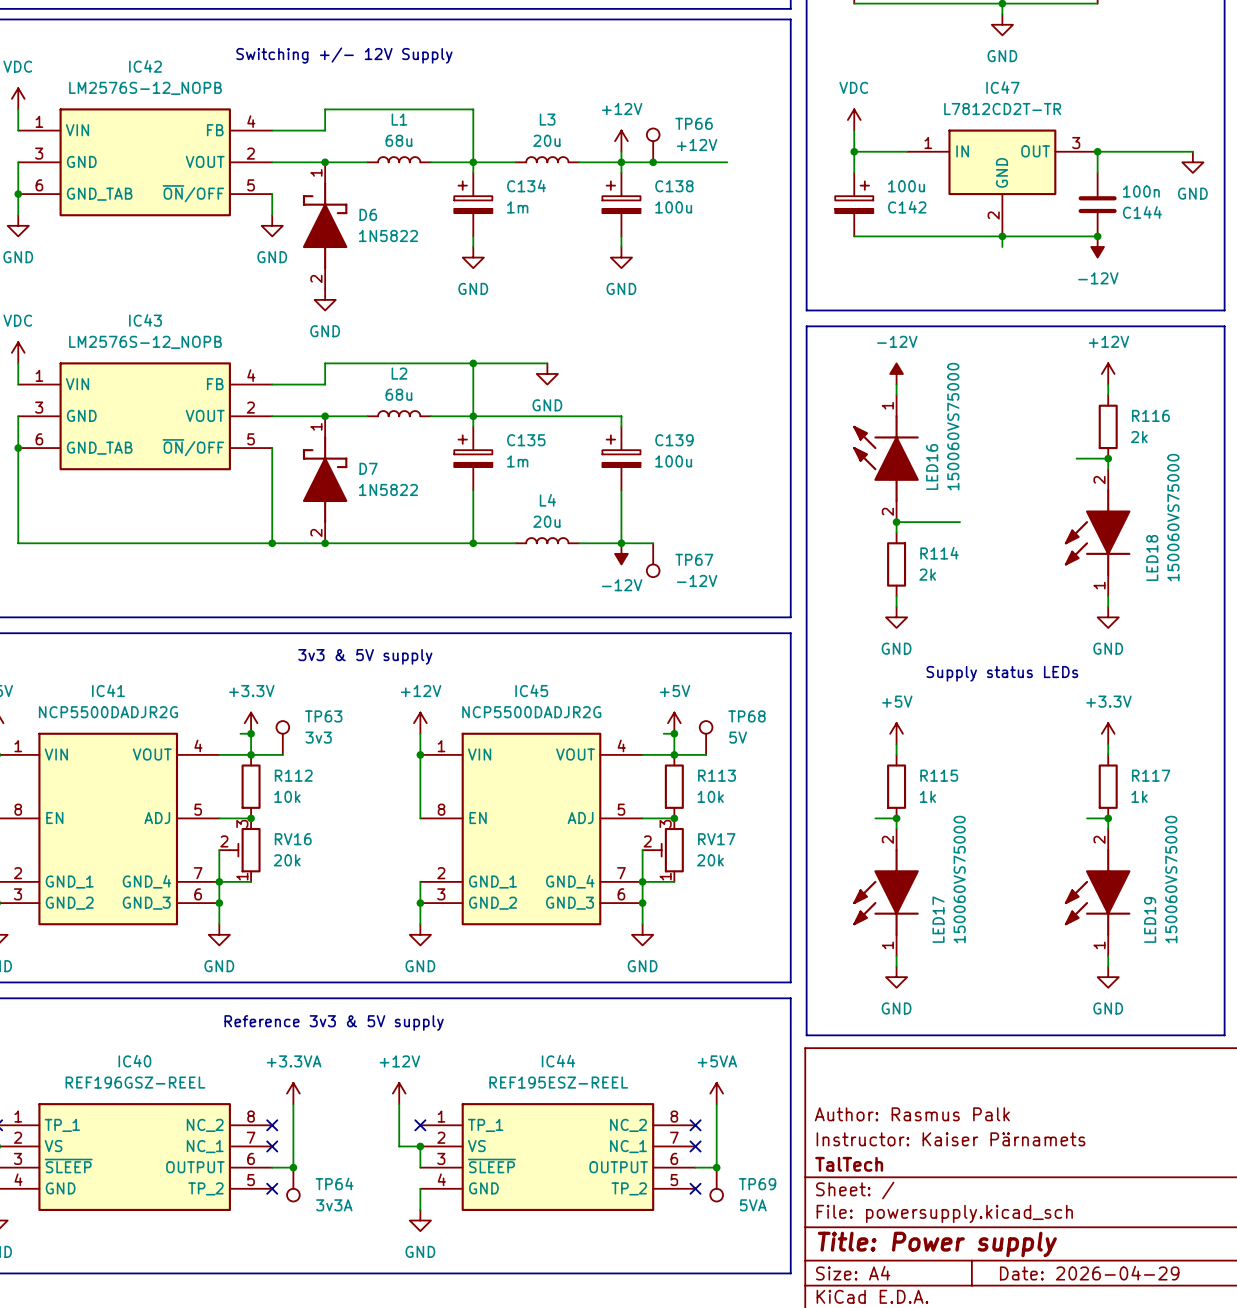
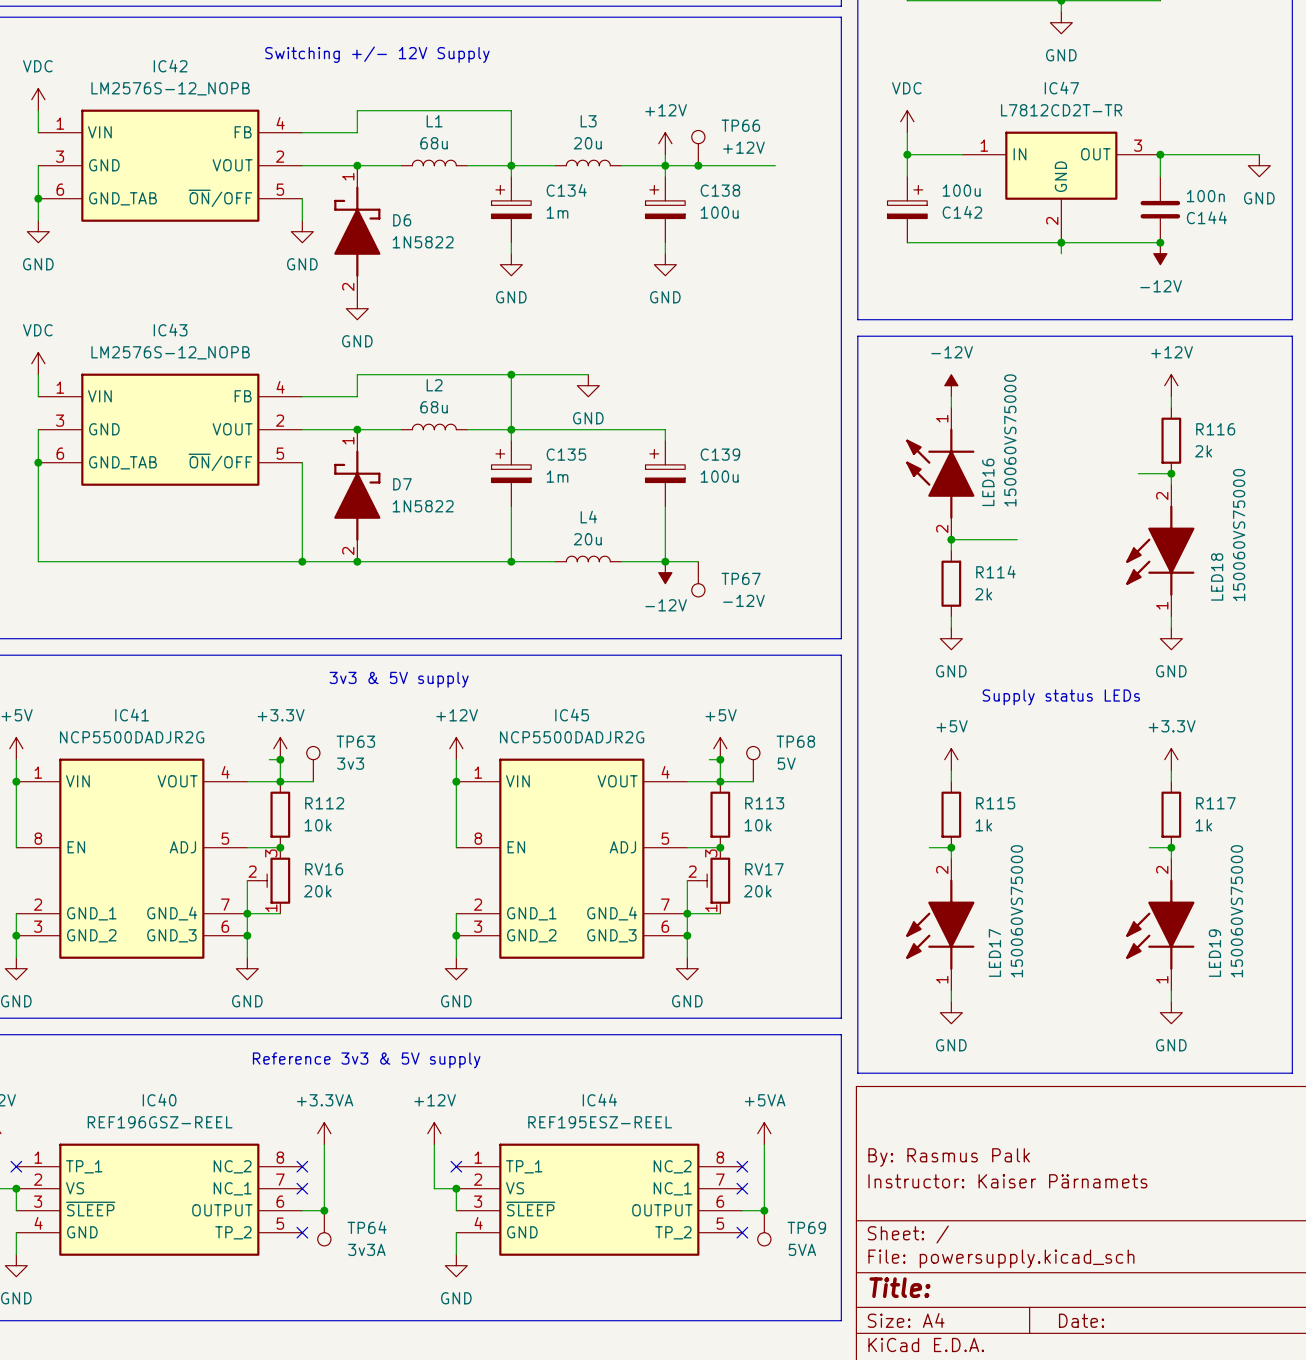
title block: Author: Rasmus Palk (912, 1114) -> By: Rasmus Palk (949, 1157)
title block: TalTech (849, 1164) -> none
title block: Title: Power supply (937, 1244) -> Title: (899, 1287)
title block: Date: 2026-04-29 (1089, 1273) -> Date: (1081, 1320)

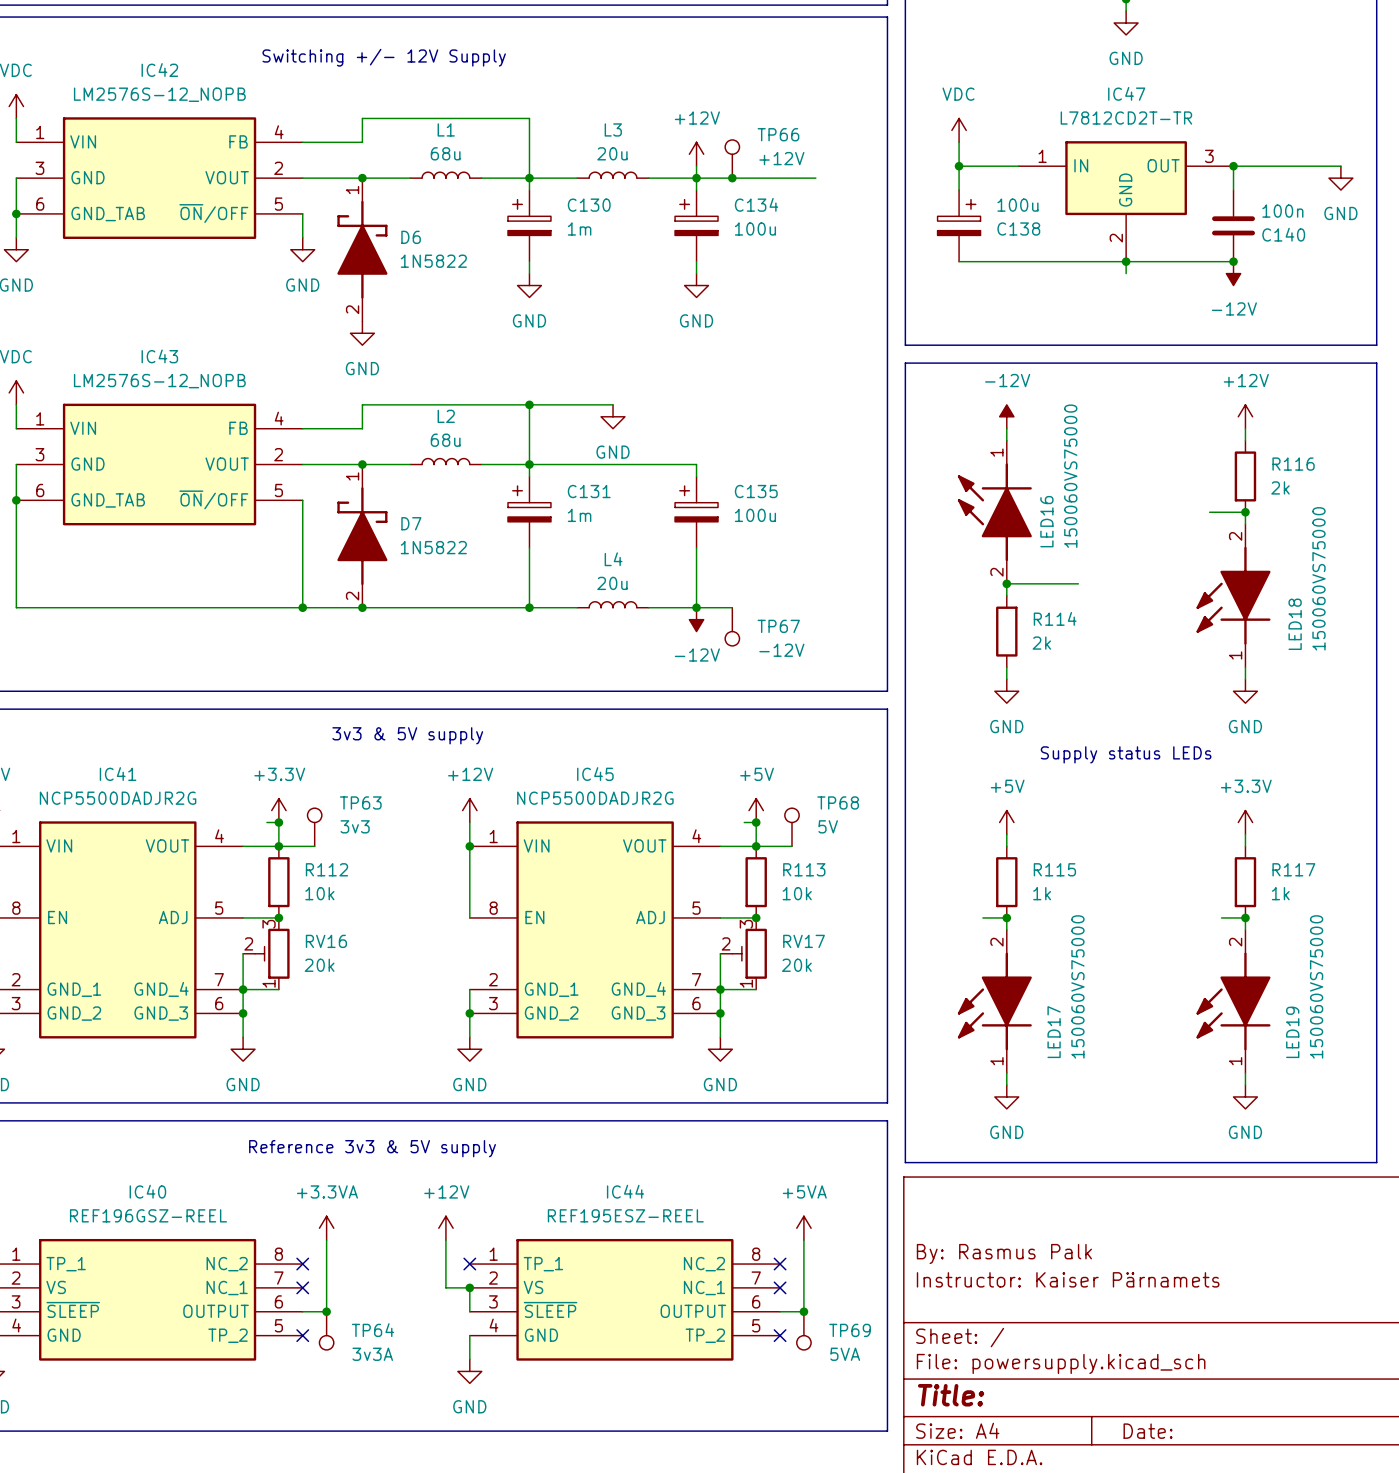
C134 name: C134 (566, 190) -> C130 (589, 205)
C138 name: C138 (720, 190) -> C134 (756, 204)
C142 name: C142 (962, 212) -> C138 (1018, 229)
C144 name: C144 (1206, 217) -> C140 (1283, 234)
C135 name: C135 (566, 454) -> C131 (589, 491)
C139 name: C139 (720, 454) -> C135 (756, 491)

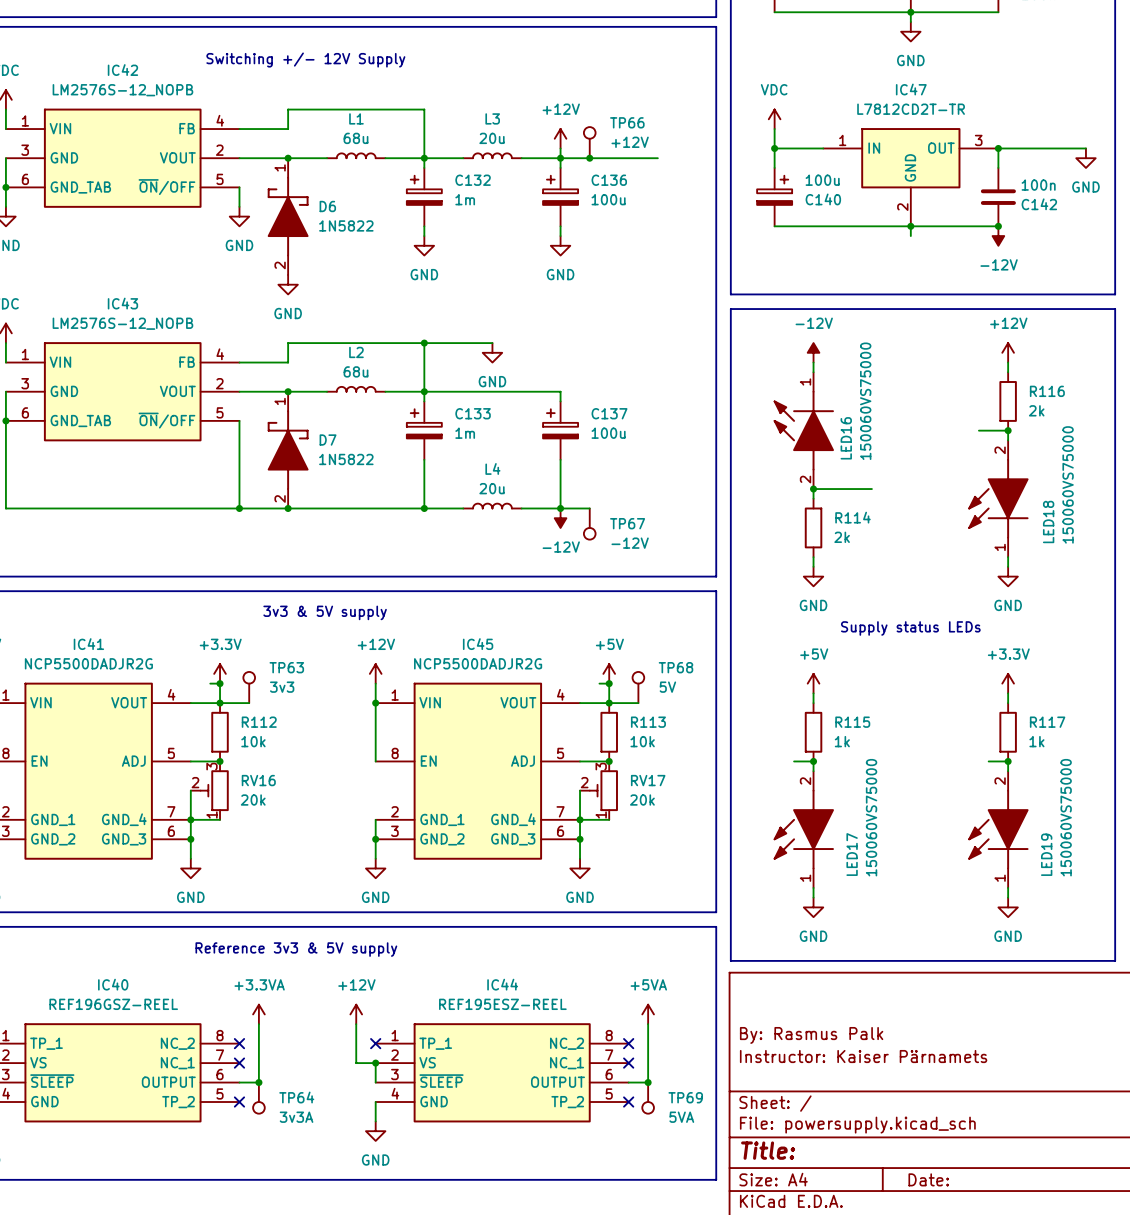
C134 name: C134 (756, 204) -> C136 (609, 180)
C130 name: C130 (589, 205) -> C132 (473, 180)
C138 name: C138 (1018, 229) -> C140 (823, 199)
C140 name: C140 (1283, 234) -> C142 (1039, 204)
C131 name: C131 (589, 491) -> C133 (473, 413)
C135 name: C135 (756, 491) -> C137 (609, 413)

